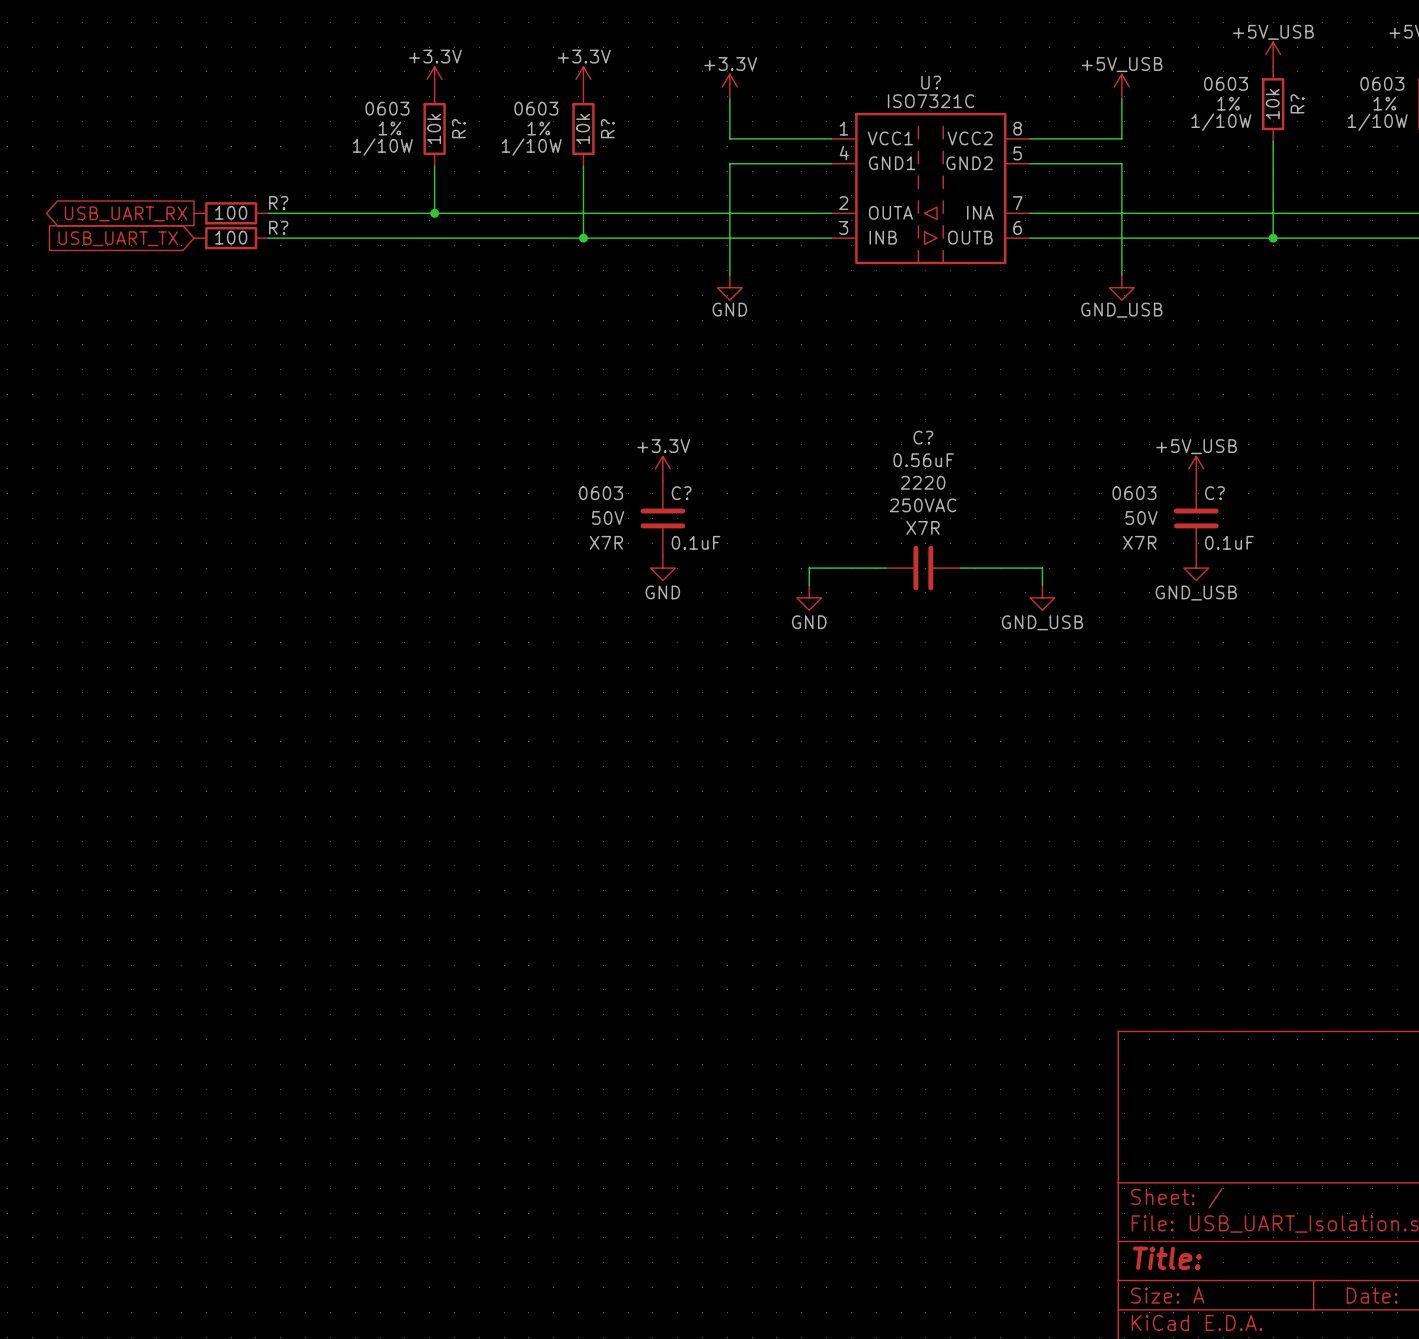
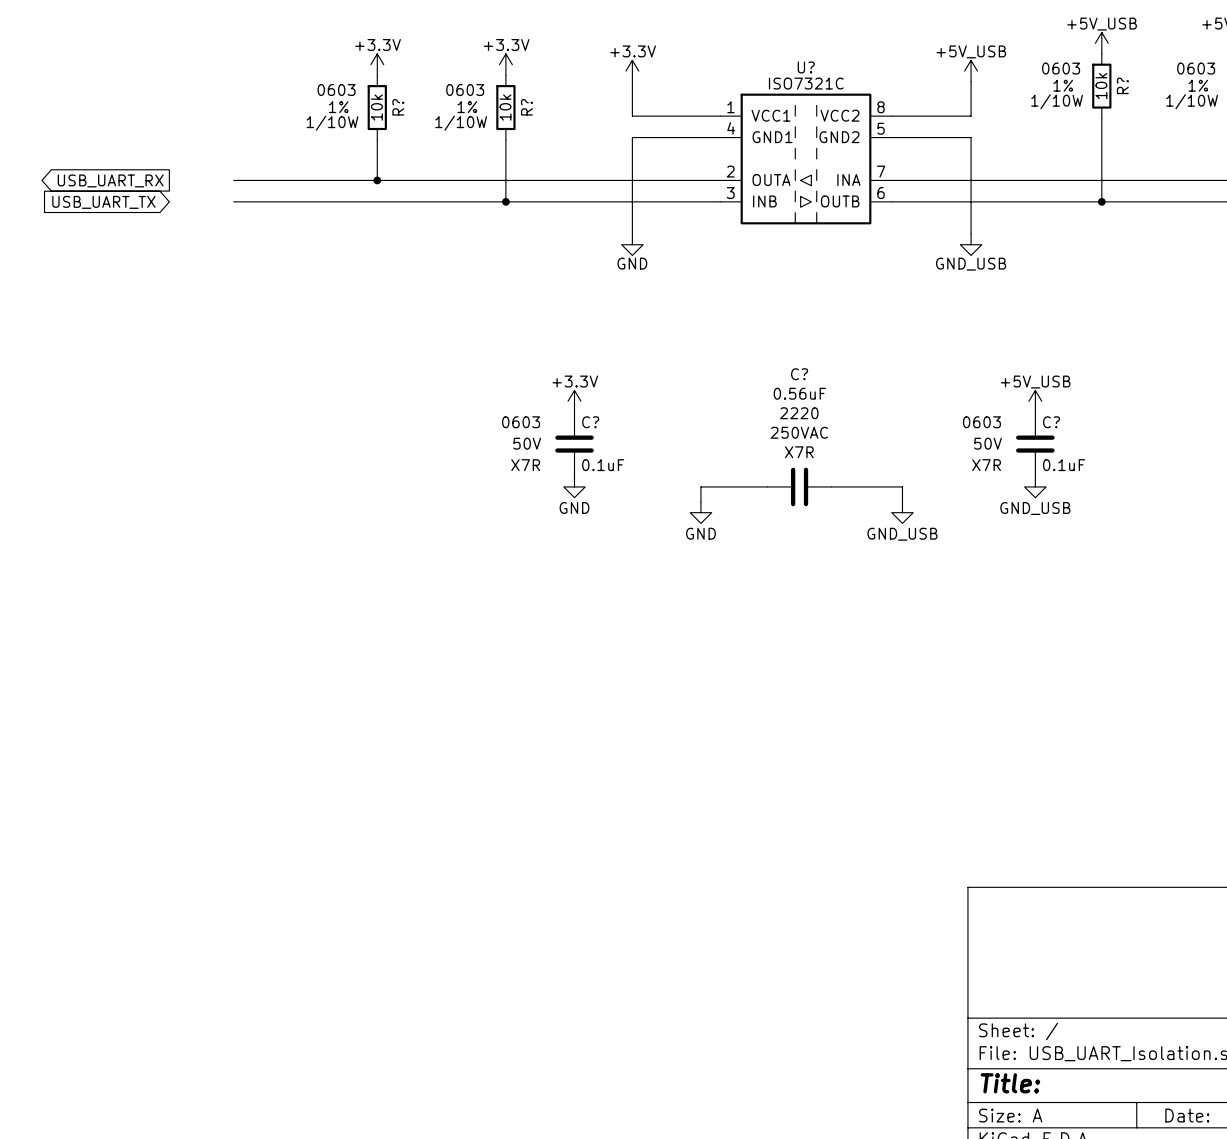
R?: 100 (231, 213) -> none
R?: 100 (231, 238) -> none

